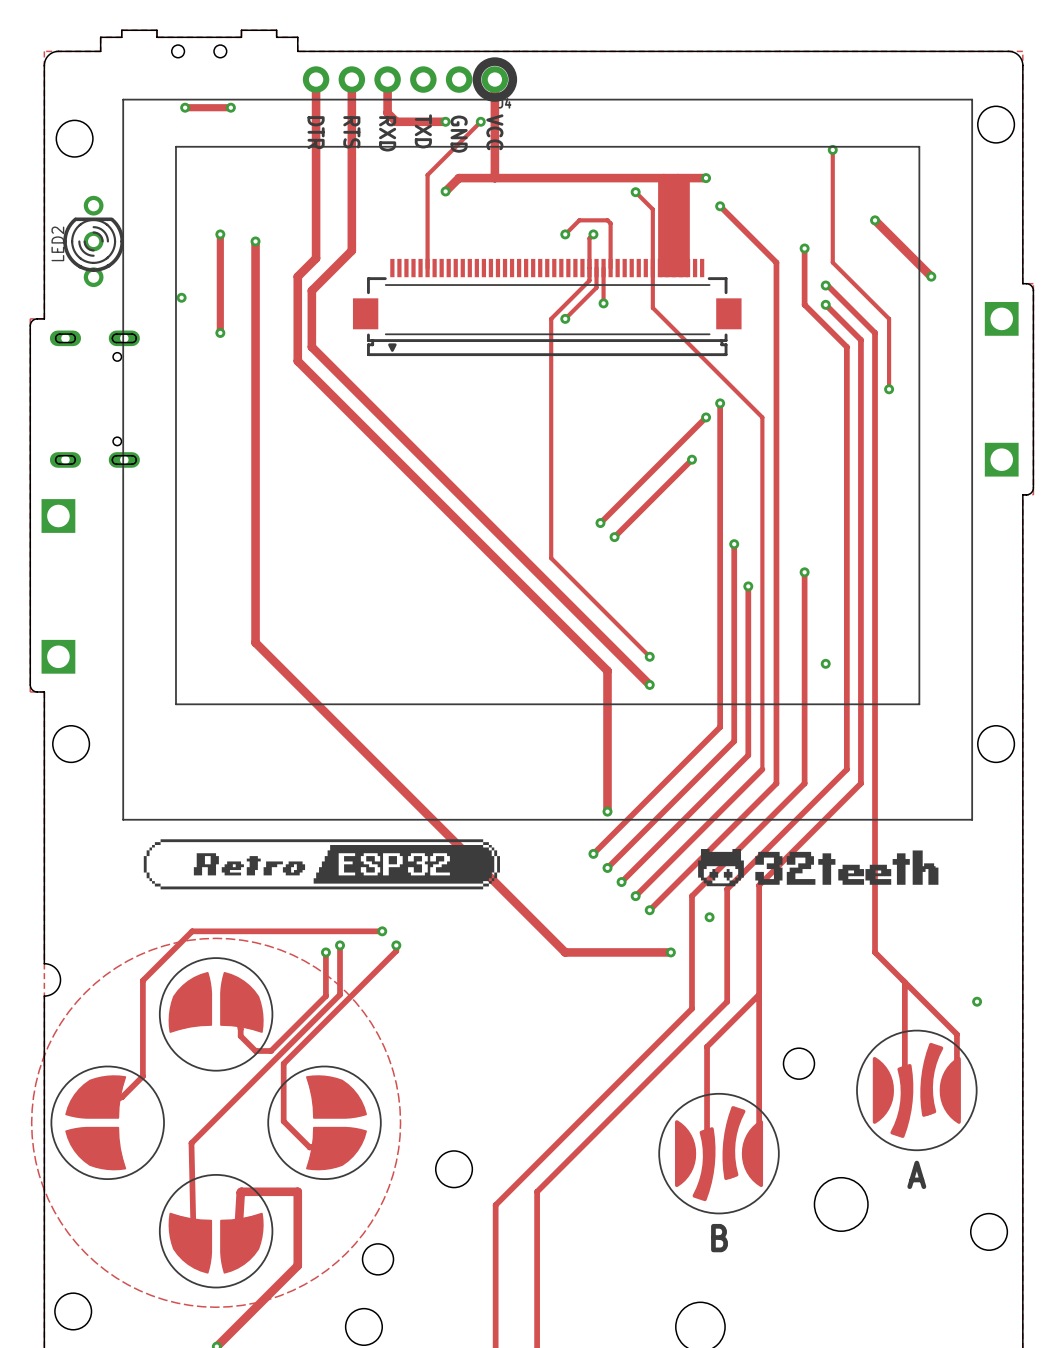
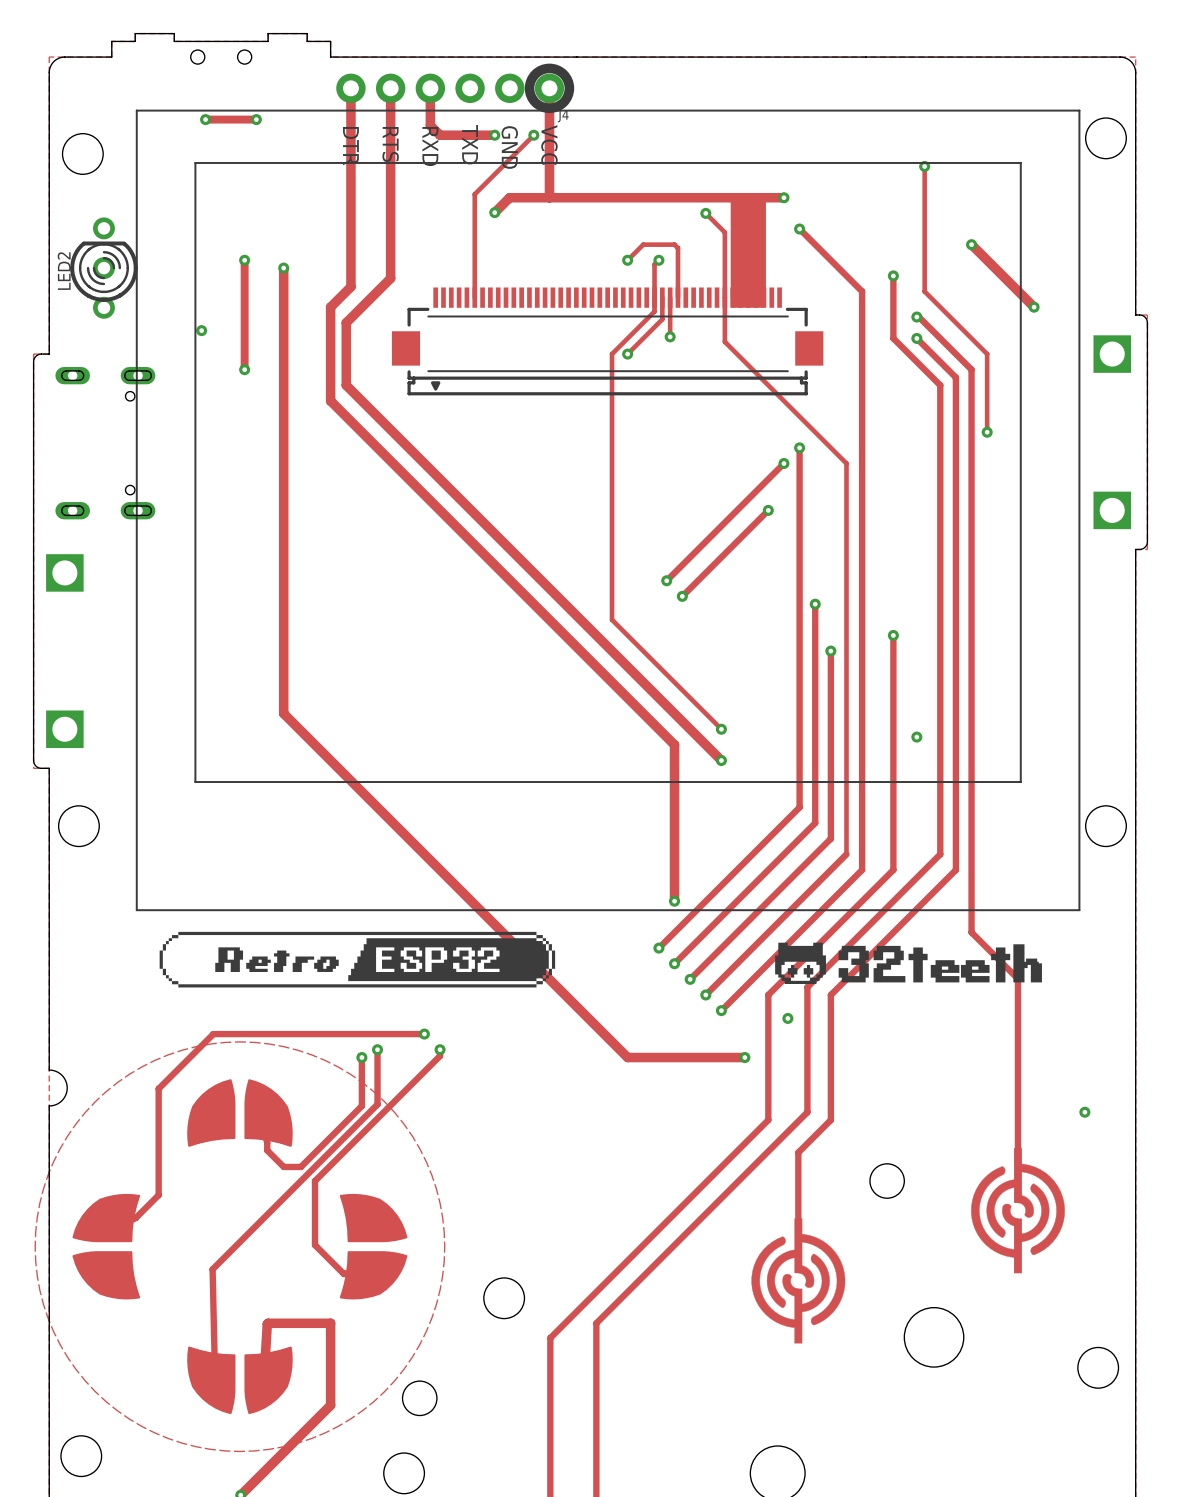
track: (875, 839) (875, 952) (956, 1034) (956, 1090) -> (971, 932) (1017, 978) (1017, 1175)
track: (759, 885) (759, 1153) -> (842, 982) (830, 995) (830, 1120) (798, 1152) (798, 1245)
part footprint: [158, 957, 274, 1072] -> [187, 1079, 293, 1147]
track: (904, 982) (904, 1069) -> none
track: (759, 994) (707, 1046) (707, 1132) -> none
part footprint: [856, 1029, 978, 1152] -> [971, 1148, 1065, 1274]
part footprint: [50, 1065, 165, 1181] -> [72, 1193, 141, 1300]
part footprint: [267, 1065, 382, 1181] -> [339, 1193, 408, 1300]
part footprint: [658, 1092, 780, 1215] -> [751, 1218, 846, 1344]
part footprint: [158, 1174, 274, 1289] -> [187, 1346, 293, 1415]
text: A (916, 1174) -> none
text: B (719, 1238) -> none

